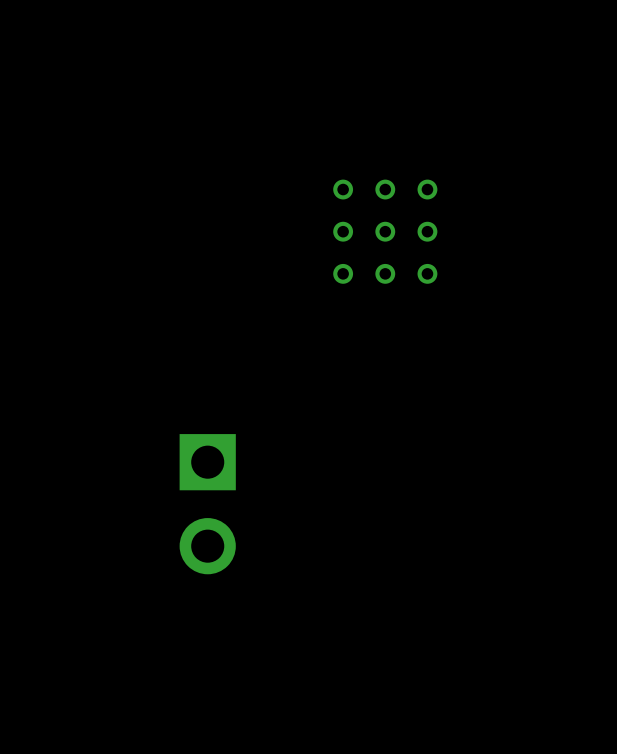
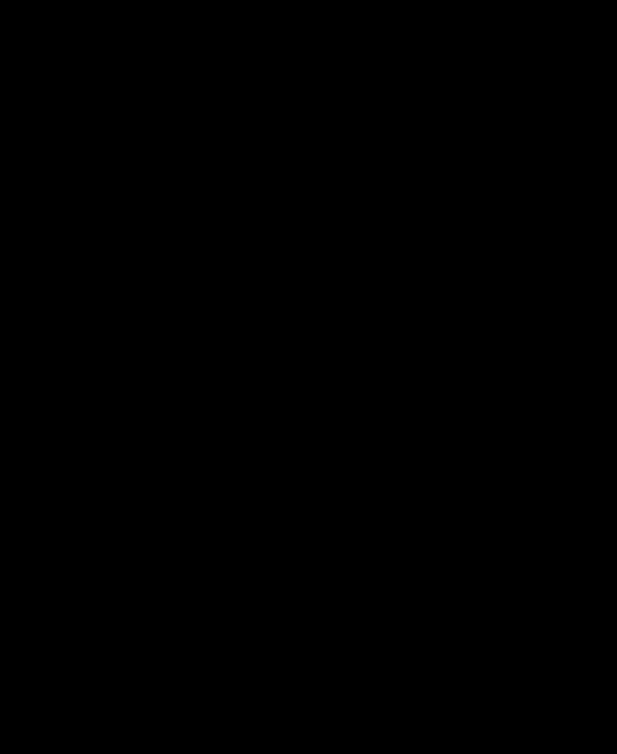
part: (385, 231) -> none
part: (207, 504) -> none

